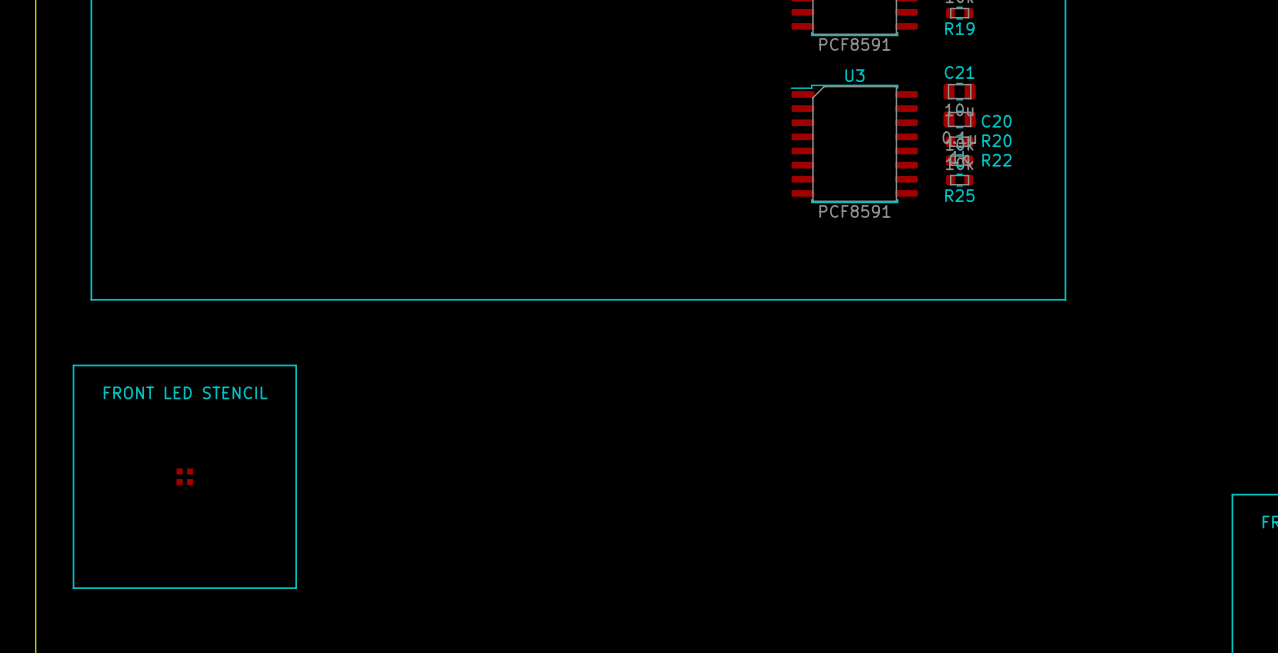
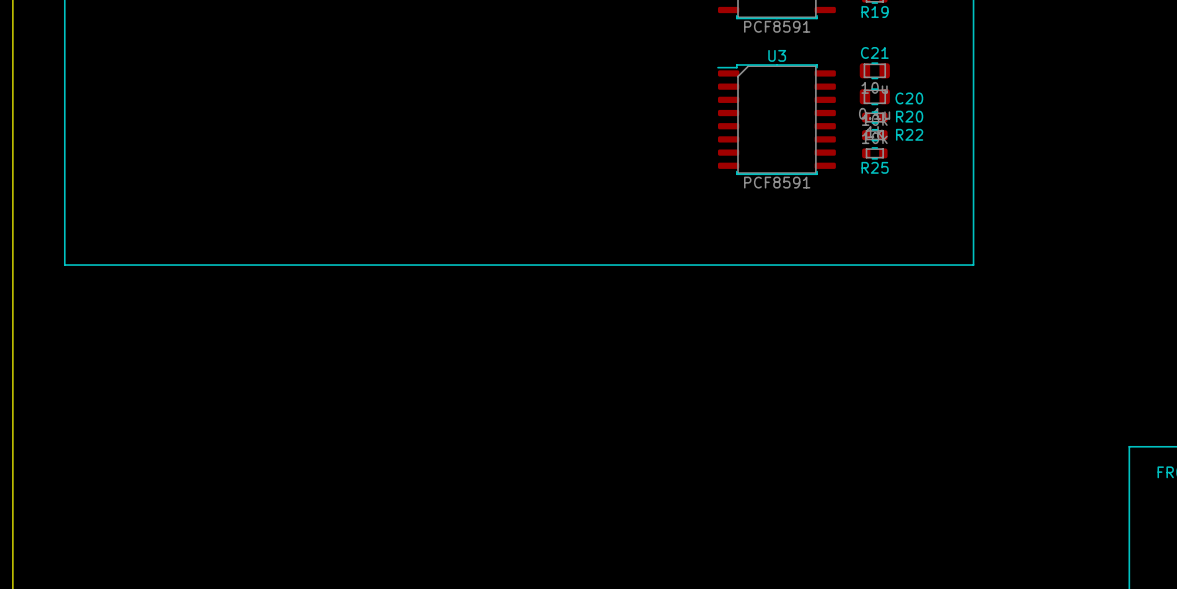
line: (73, 365) (73, 588) (296, 588) (296, 365) (73, 365) -> none
text: FRONT LED STENCIL (185, 392) -> none
part: (184, 476) -> none

